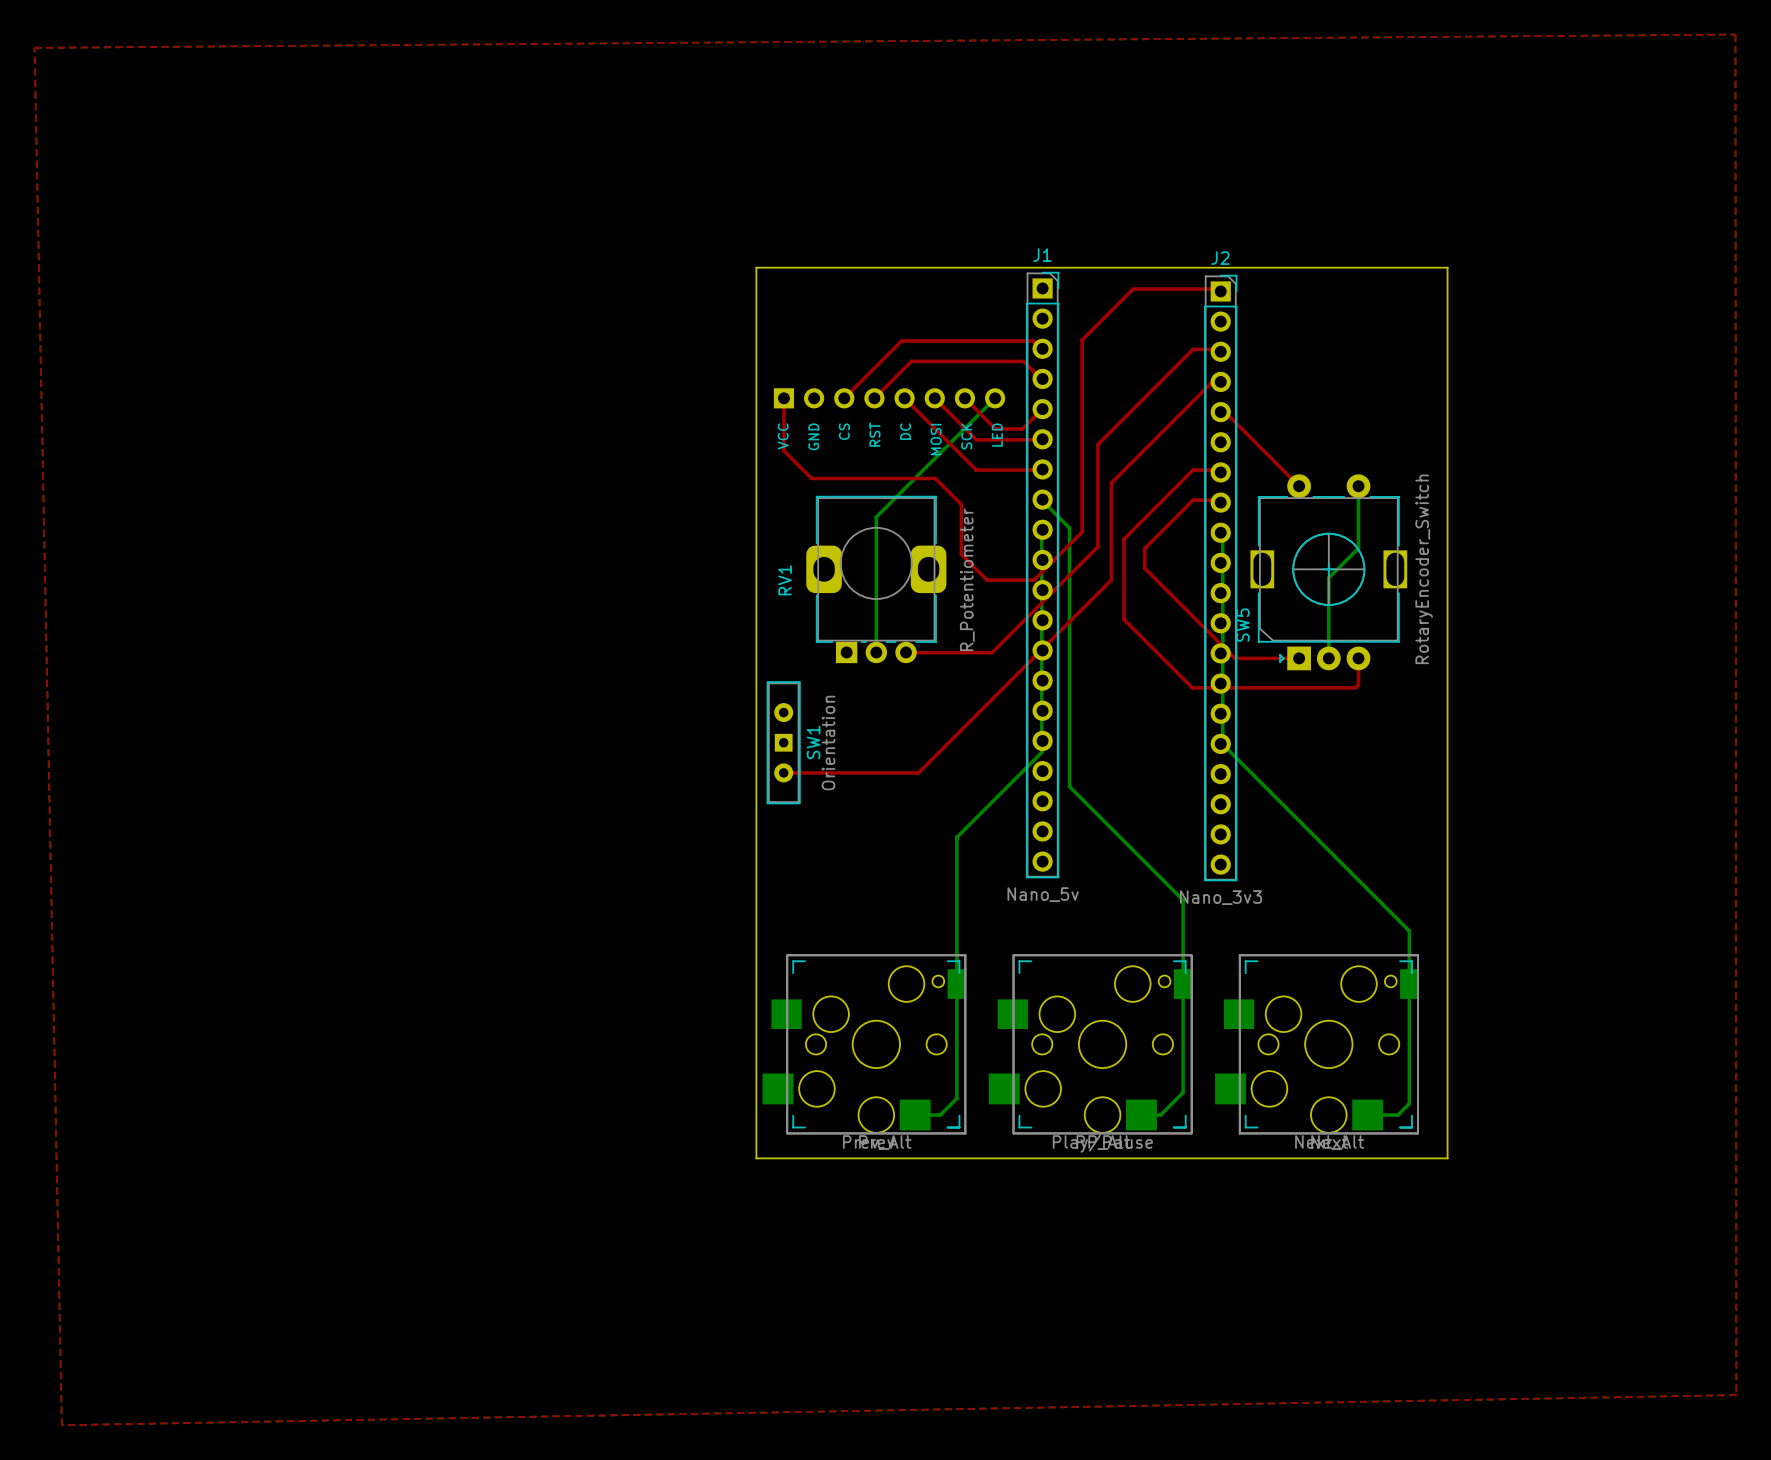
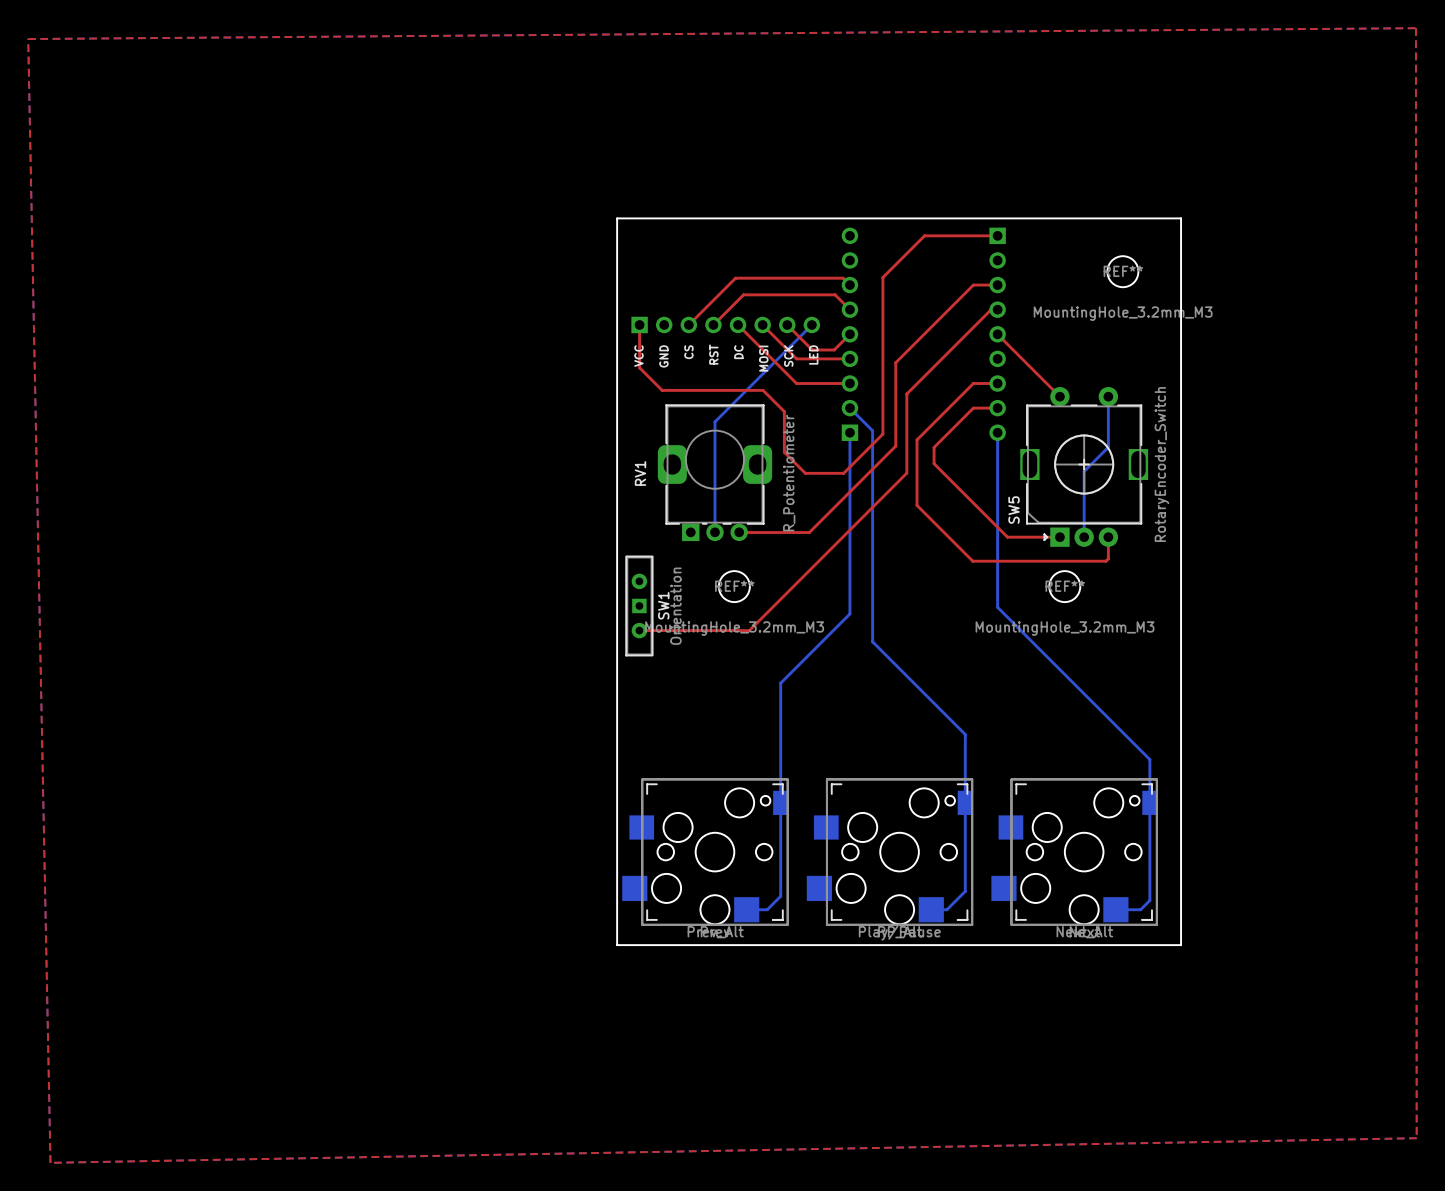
REF**: none -> MountingHole_3.2mm_M3 (1122, 271)
part: none -> (849, 334)
part: none -> (997, 334)
J1: Nano_5v (1042, 575) -> none
J2: Nano_3v3 (1220, 578) -> none
REF**: none -> MountingHole_3.2mm_M3 (734, 586)
REF**: none -> MountingHole_3.2mm_M3 (1064, 586)

